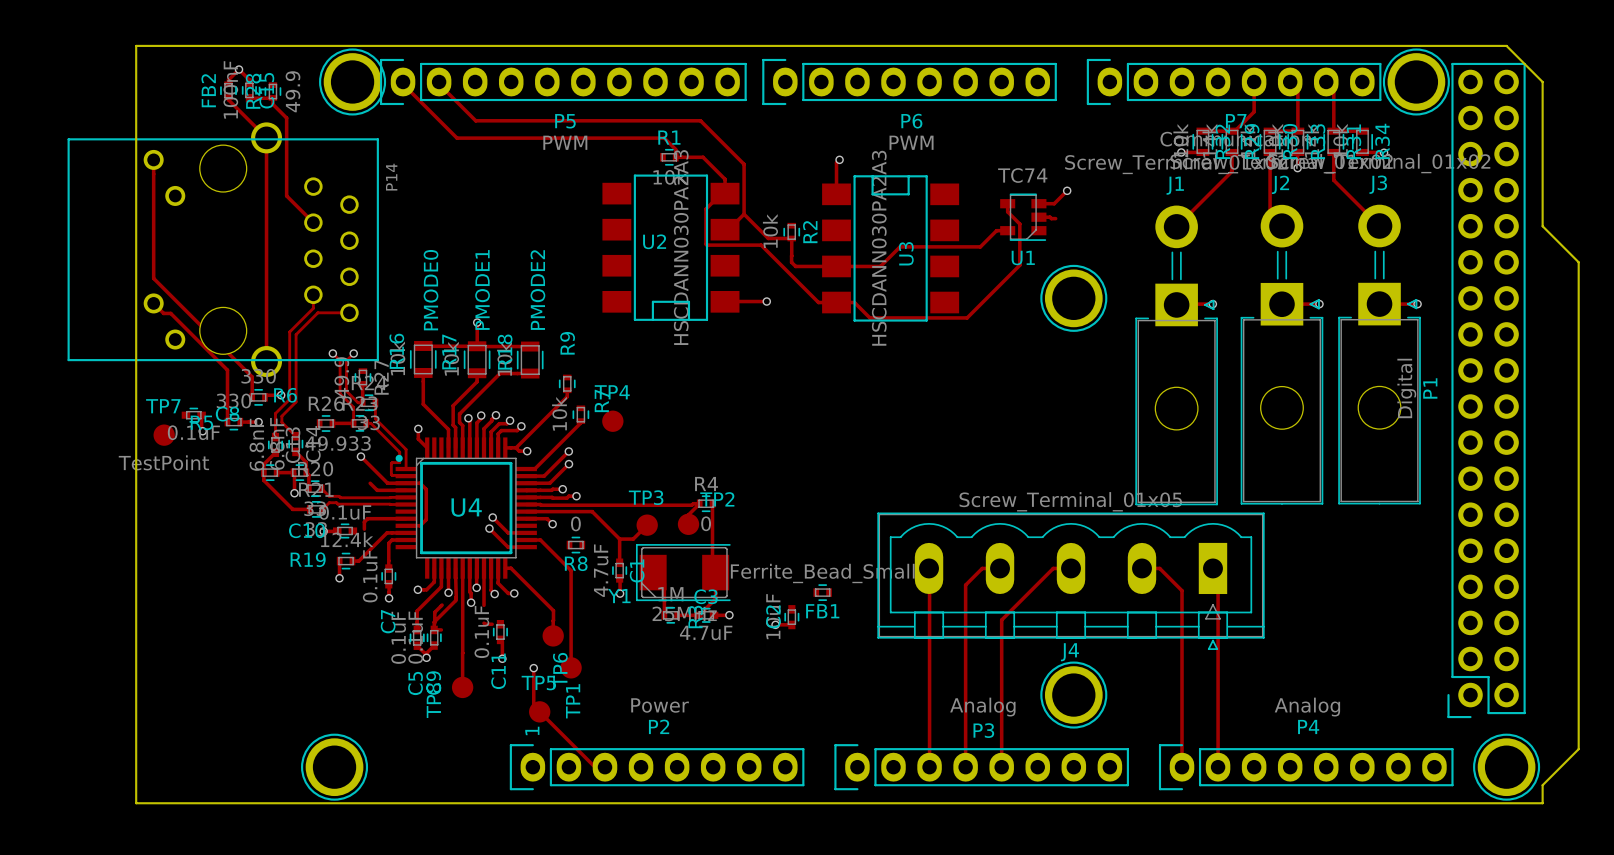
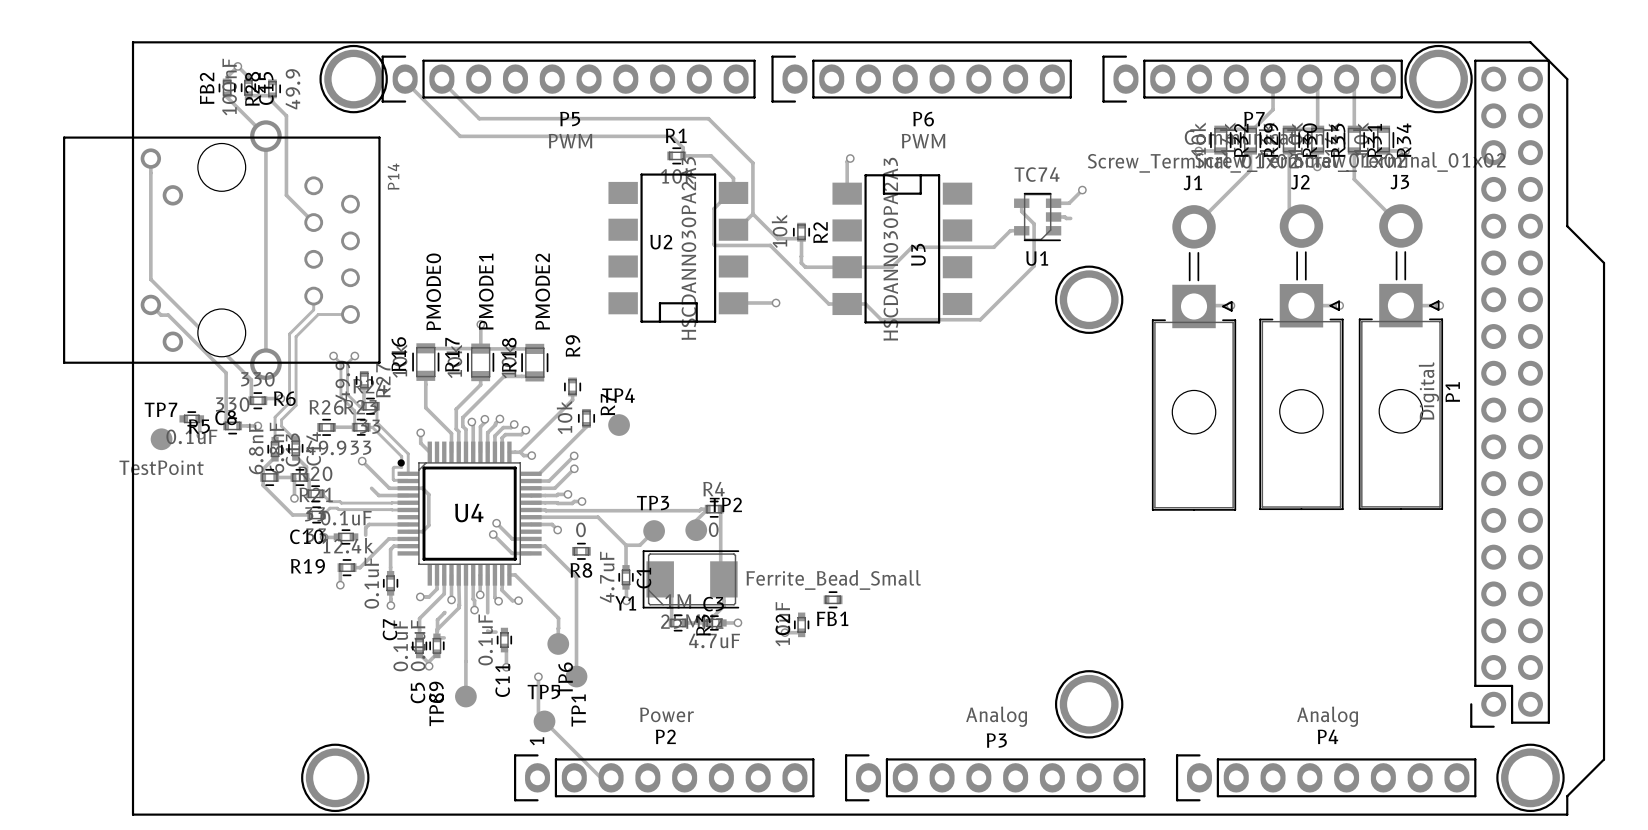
track: (929, 568) (929, 767) -> none
track: (1000, 568) (982, 568) (965, 585) (965, 767) -> none
track: (1071, 568) (1053, 568) (1001, 620) (1001, 767) -> none
track: (1141, 568) (1159, 568) (1182, 590) (1182, 767) -> none
track: (1212, 568) (1218, 573) (1218, 767) -> none
J4: Screw_Terminal_01x05 (1071, 581) -> none

